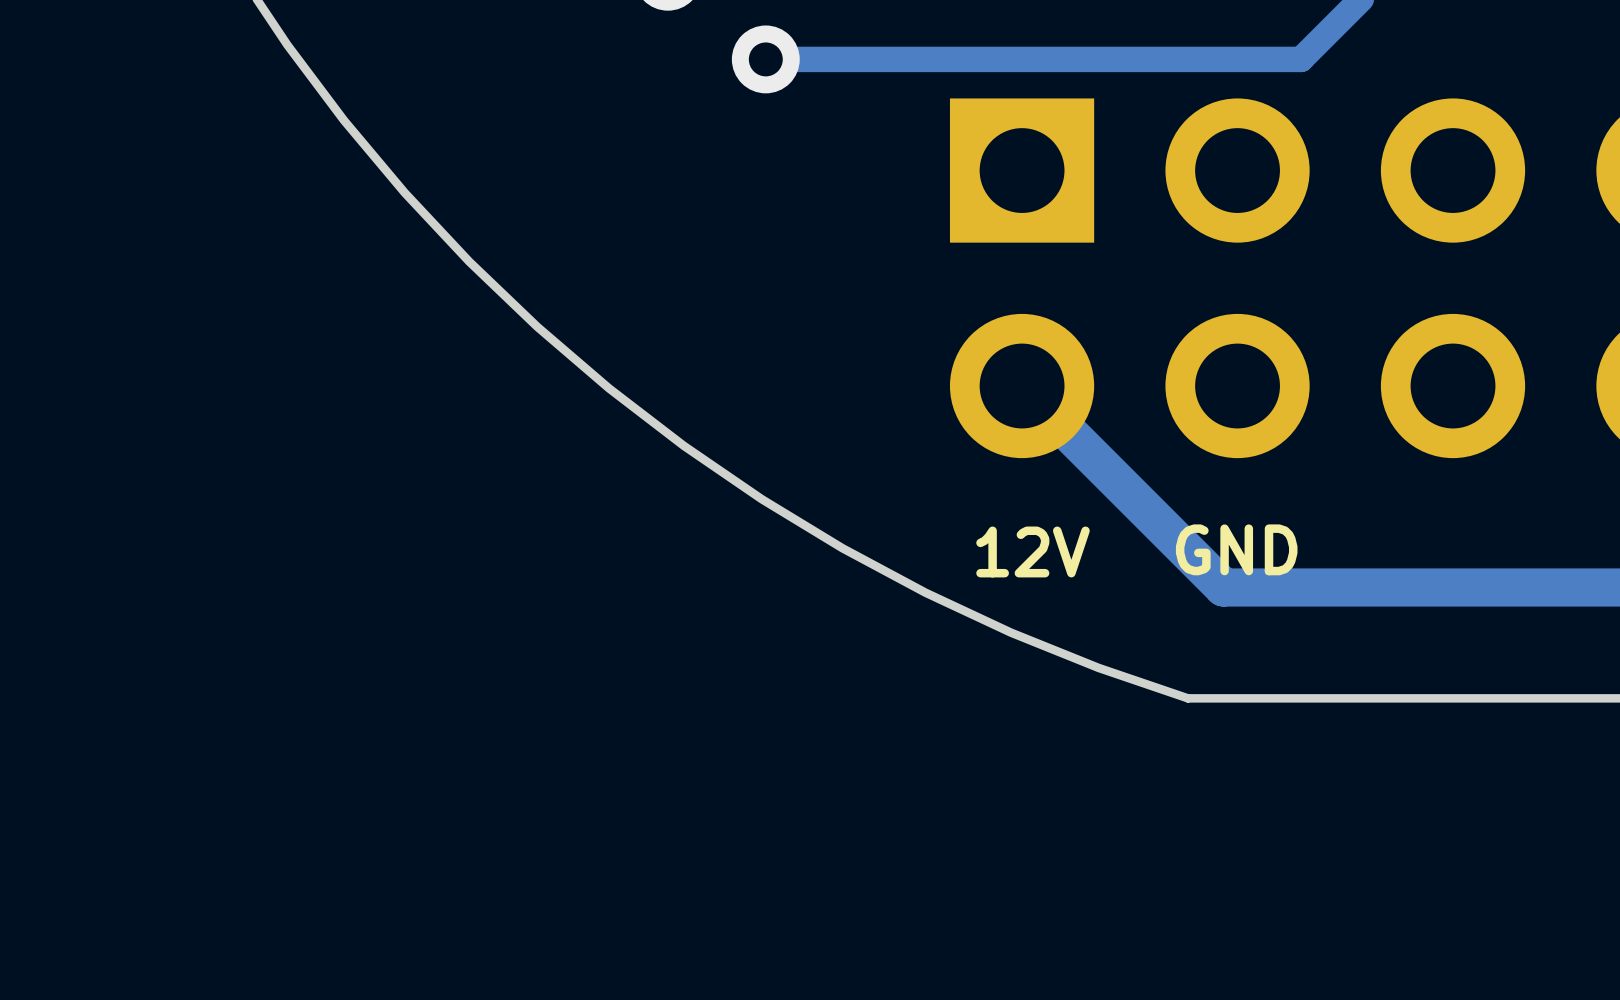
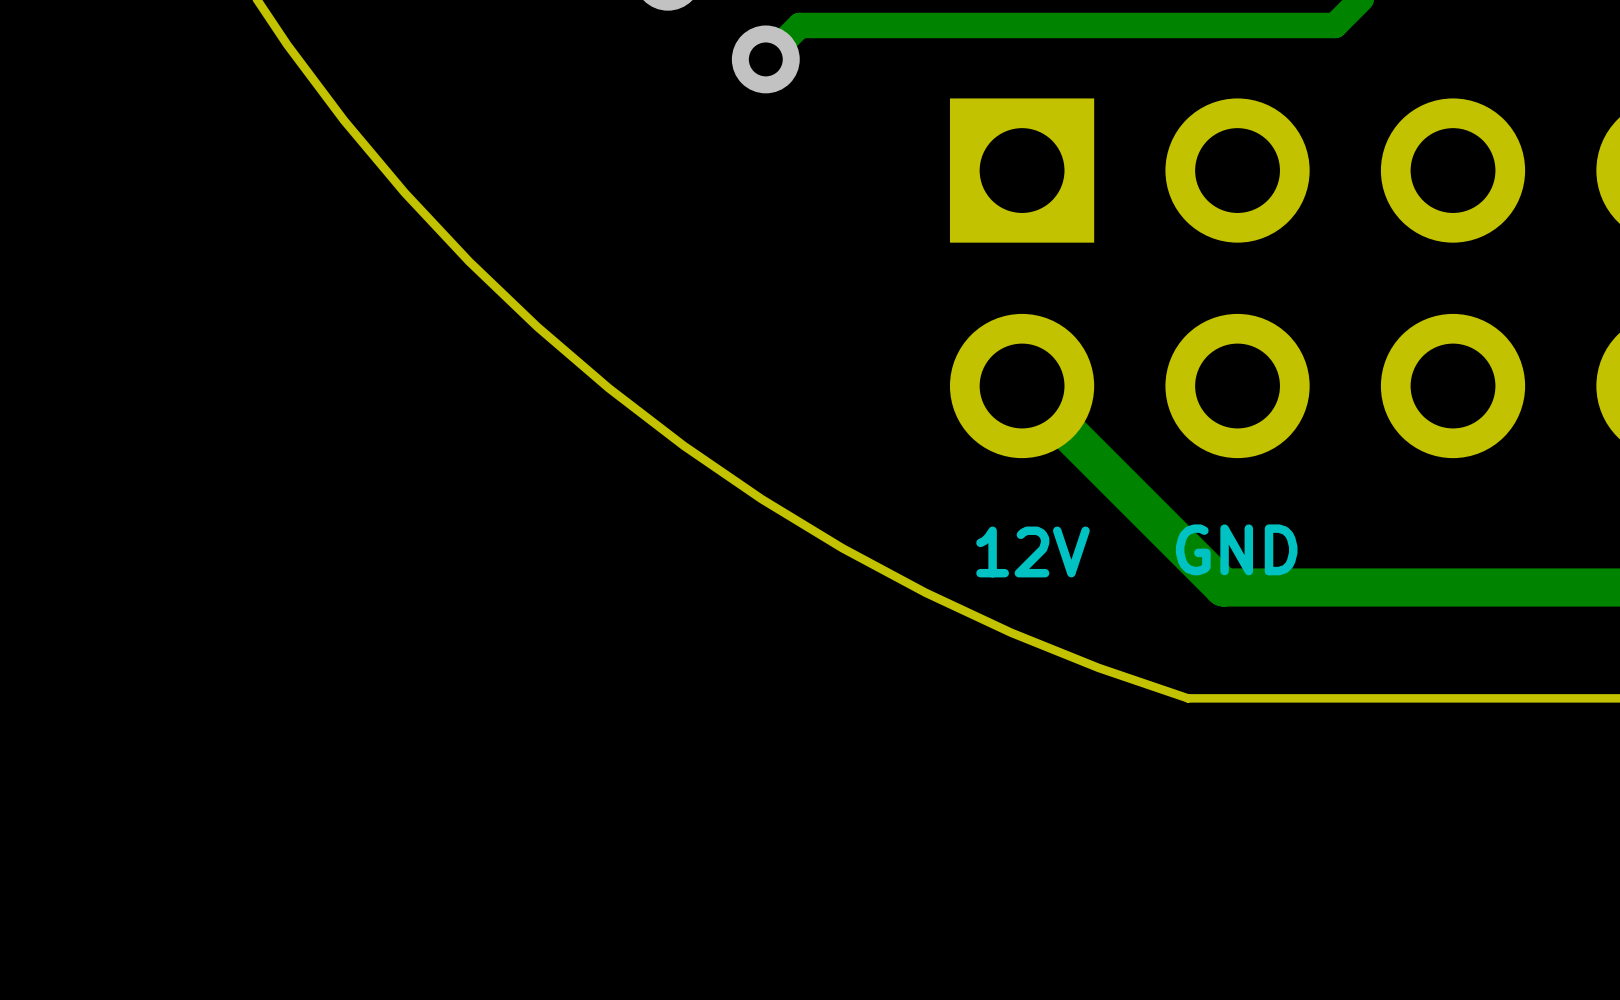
track: (1334, 25) (1300, 59) (765, 59) -> (1334, 25) (799, 25) (765, 59)

